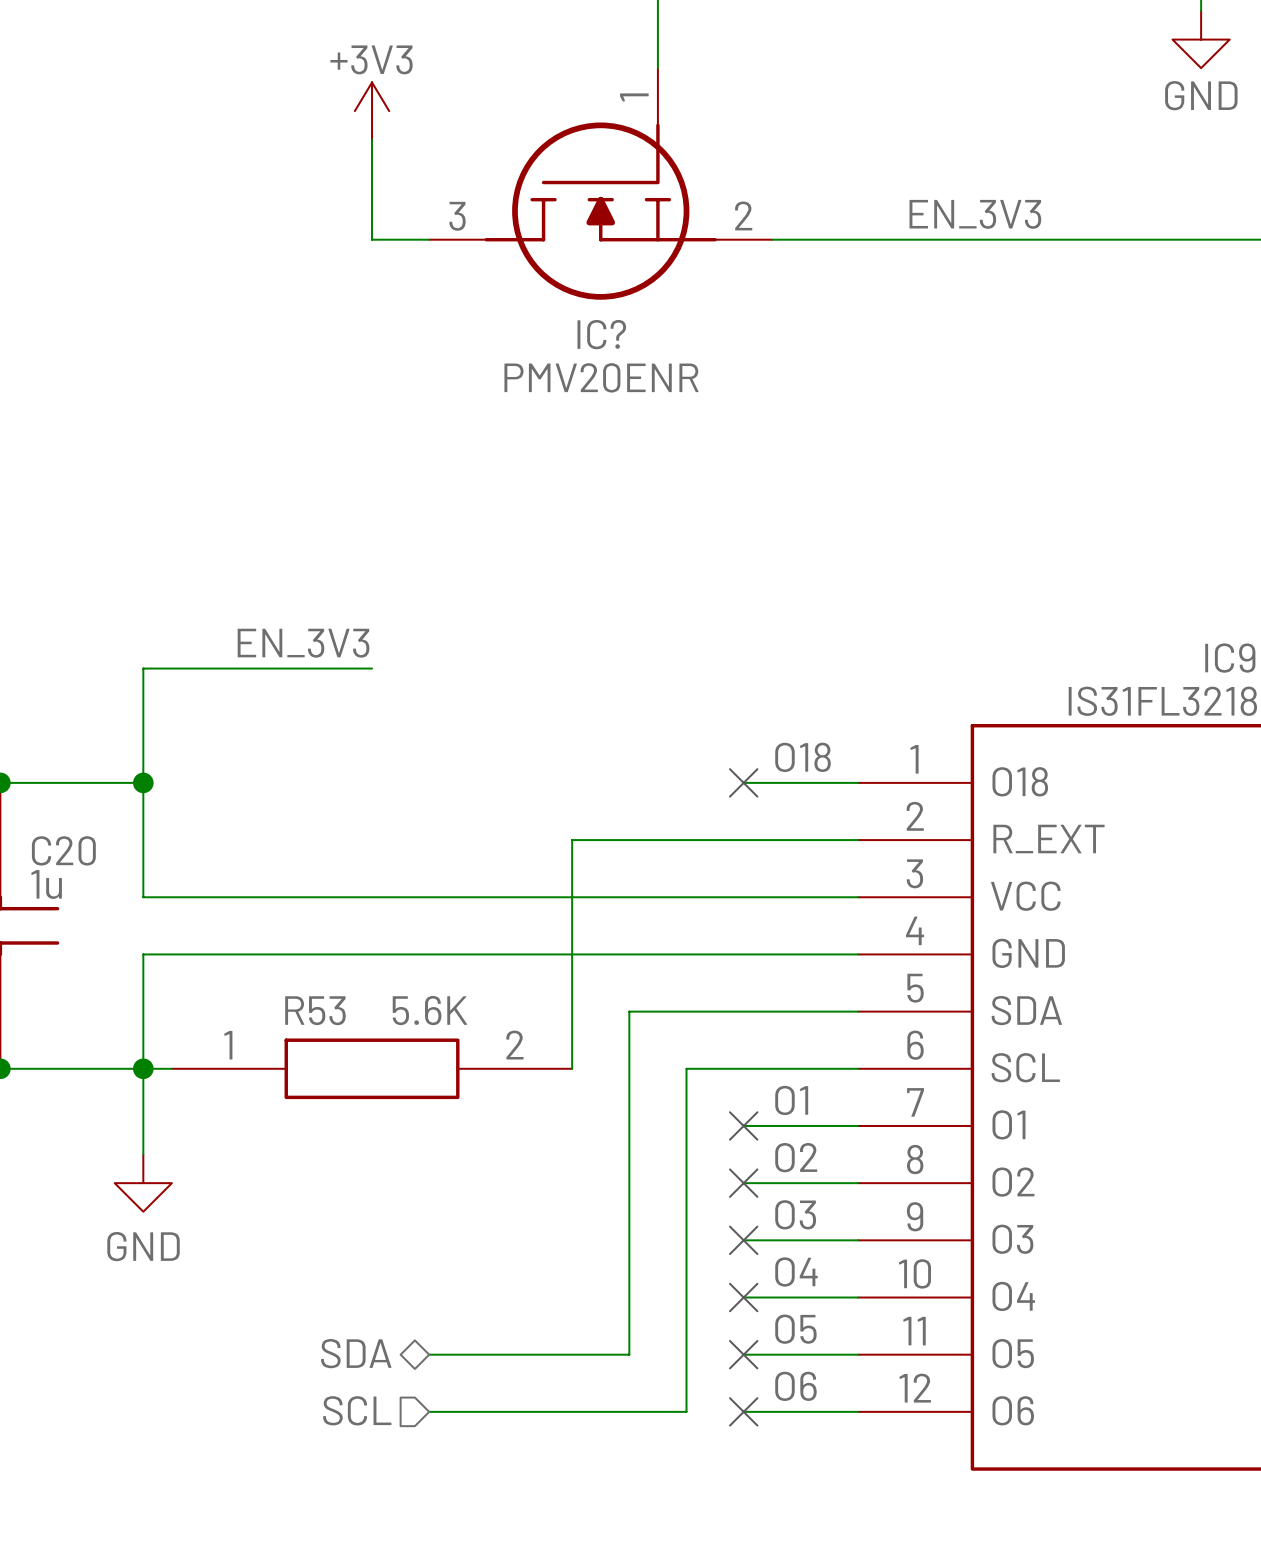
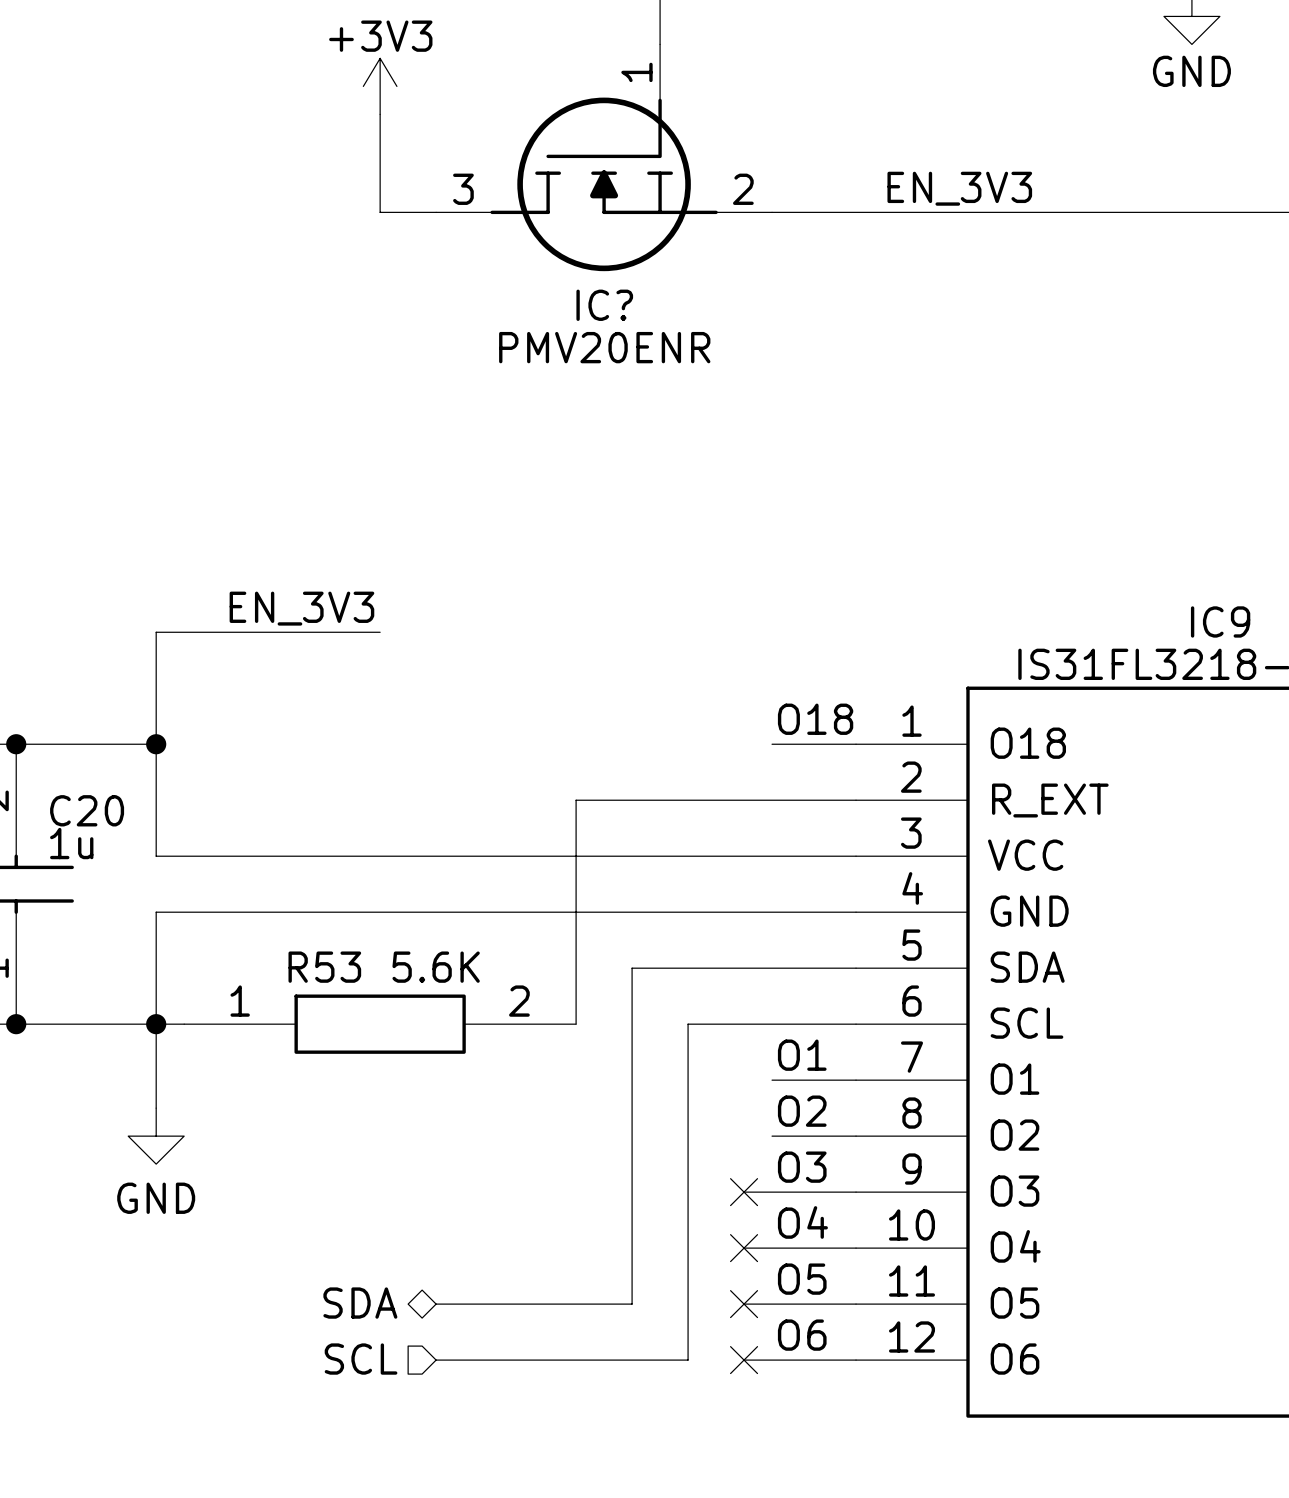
wire: (743, 782) (772, 782) -> none
no-connect mark: (743, 782) -> none
wire: (743, 1125) (772, 1125) -> none
no-connect mark: (743, 1125) -> none
wire: (743, 1183) (772, 1183) -> none
no-connect mark: (743, 1183) -> none

